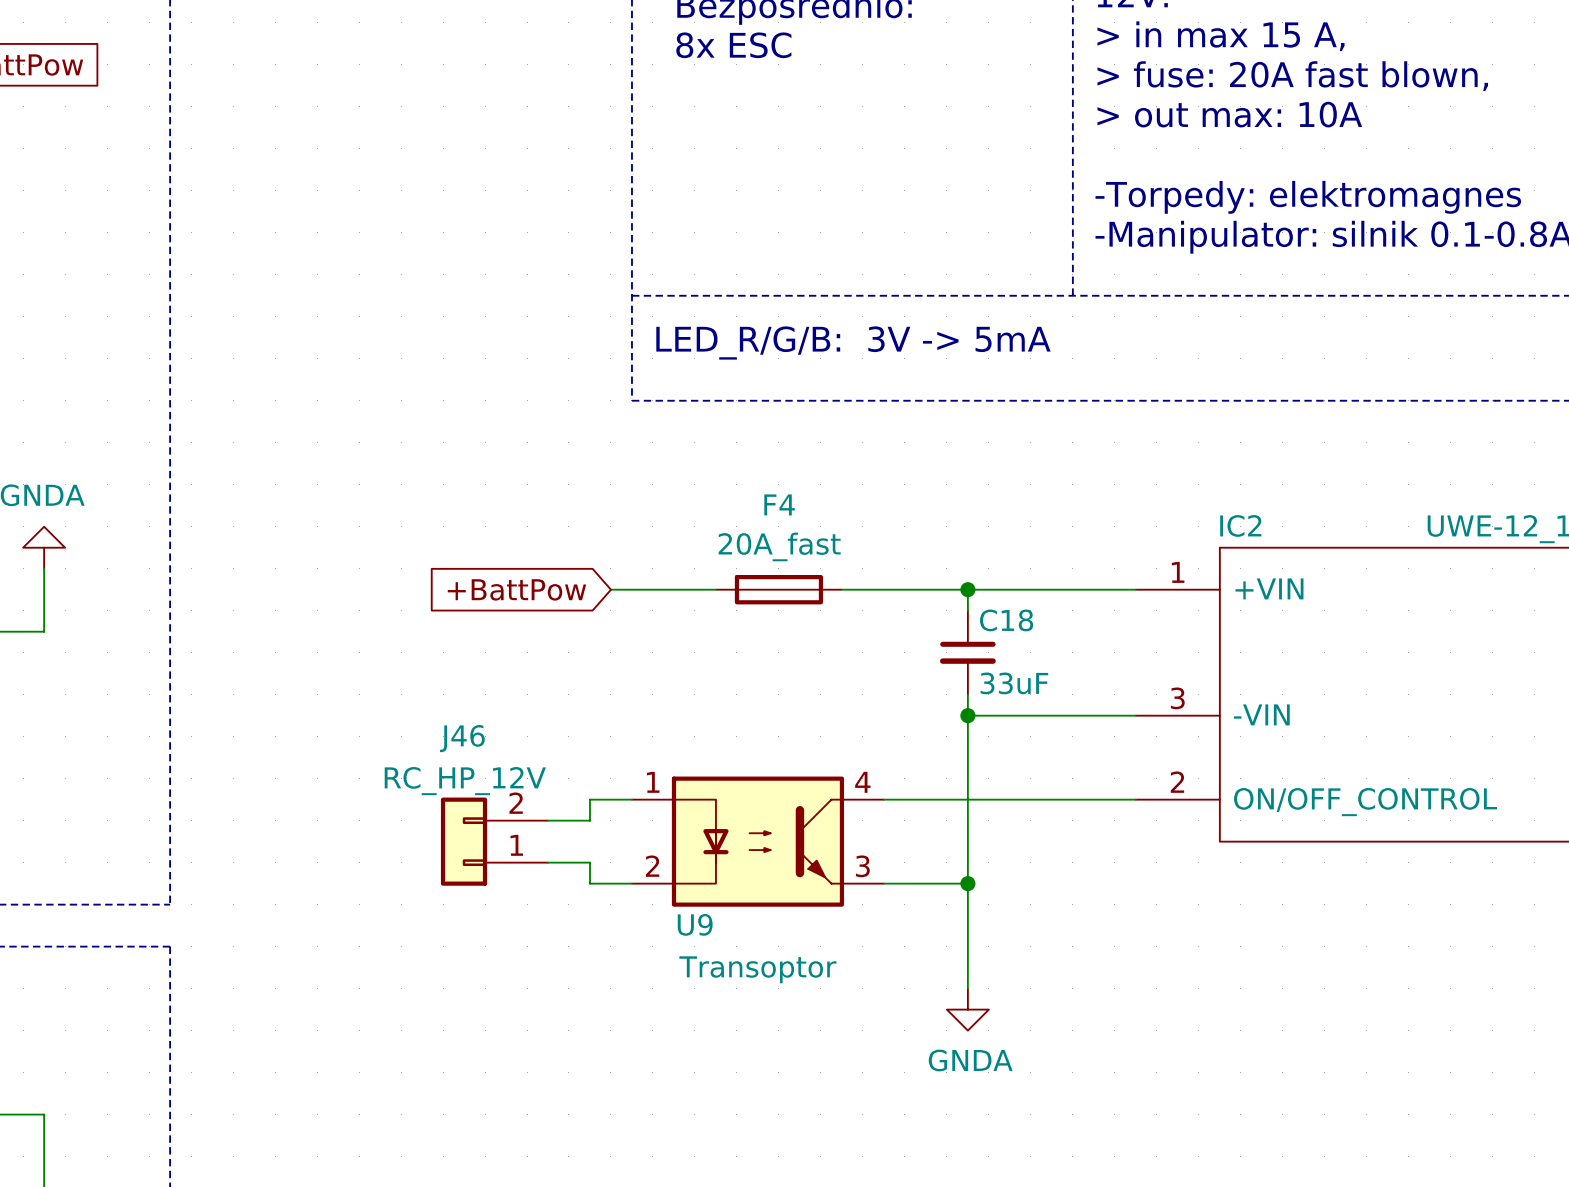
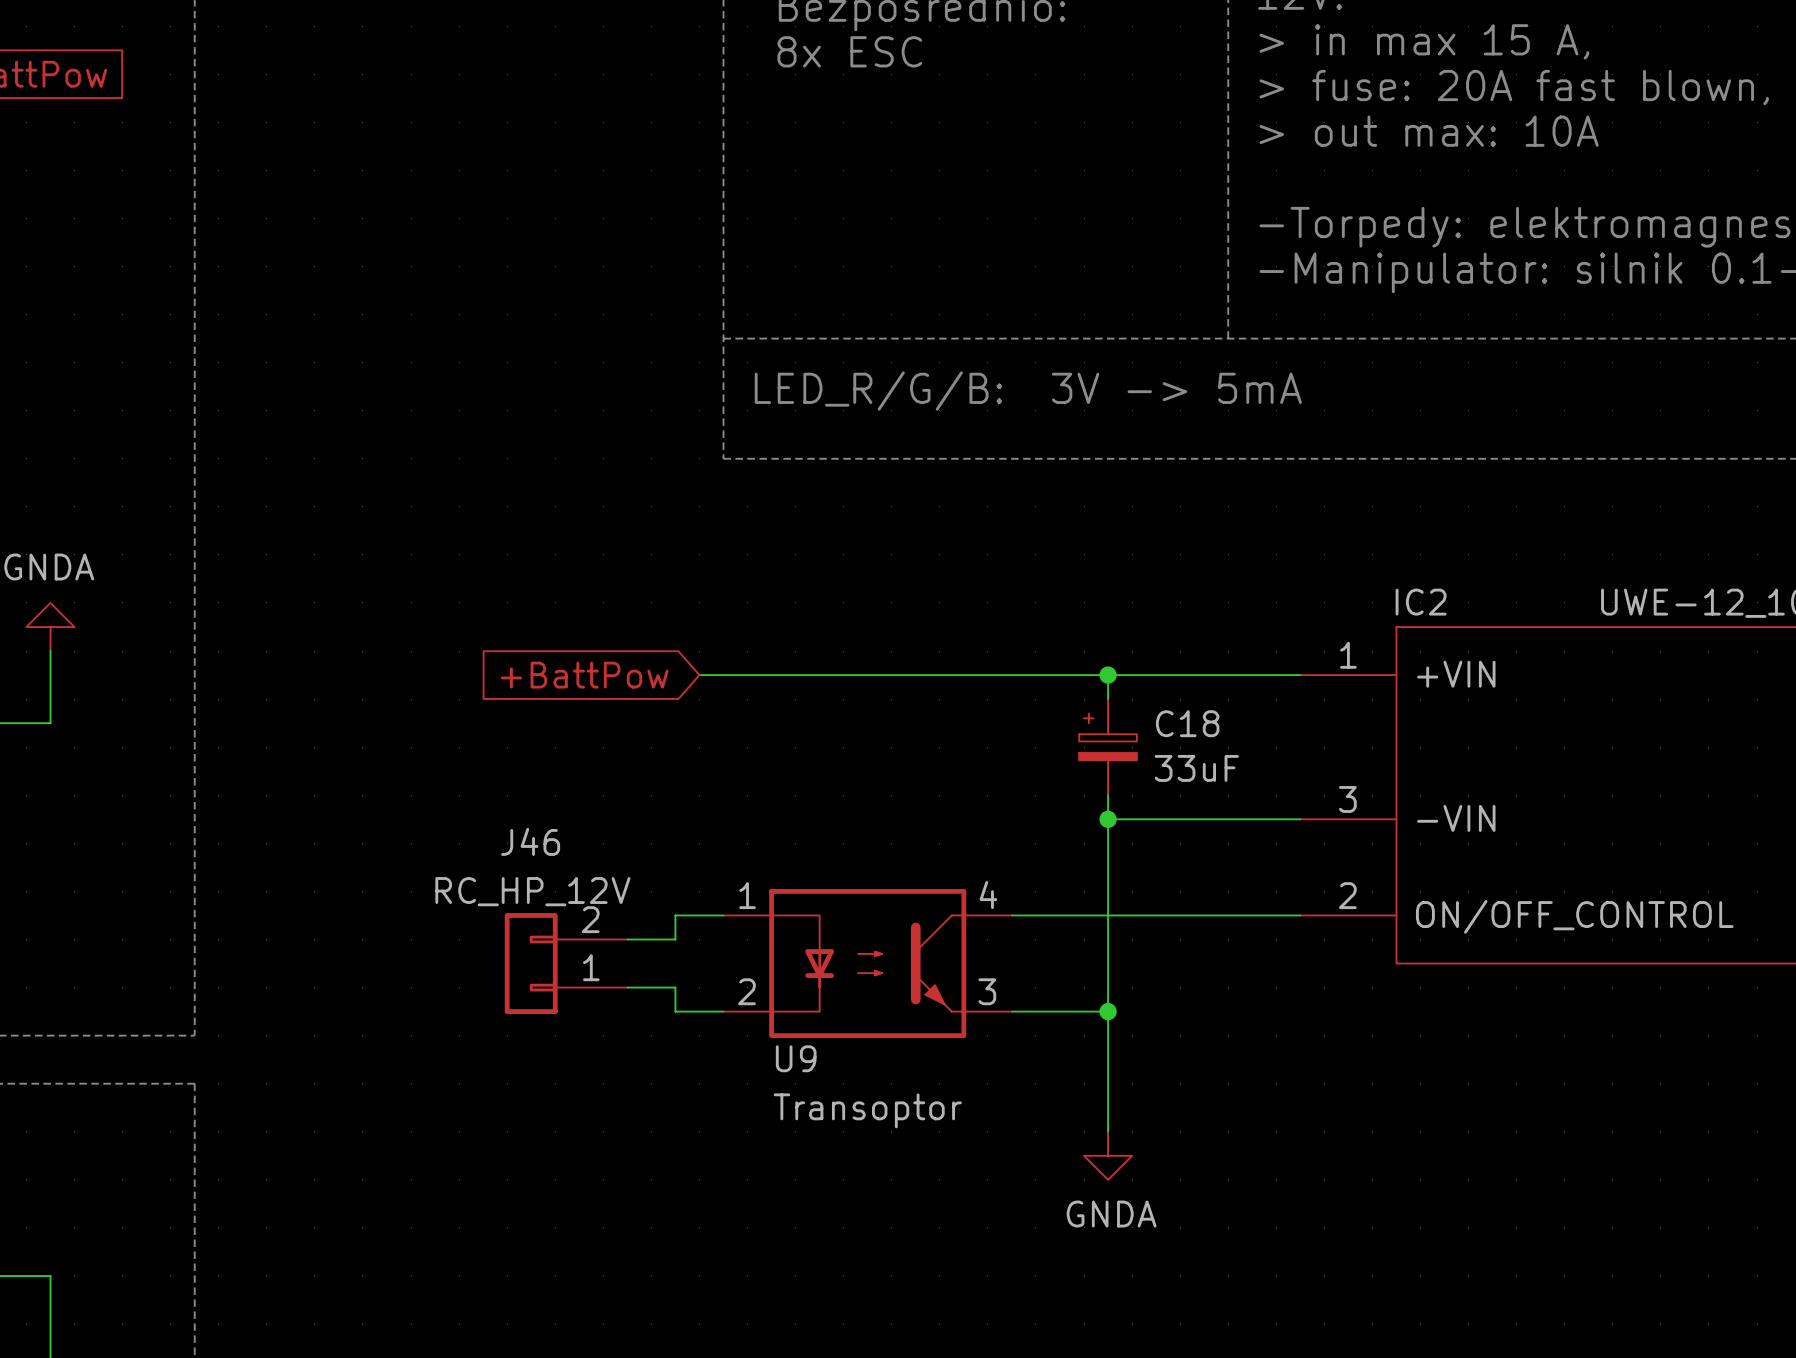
F4: 20A_fast (778, 589) -> none
C18 symbol: [939, 610, 996, 695] -> [1079, 699, 1137, 796]

